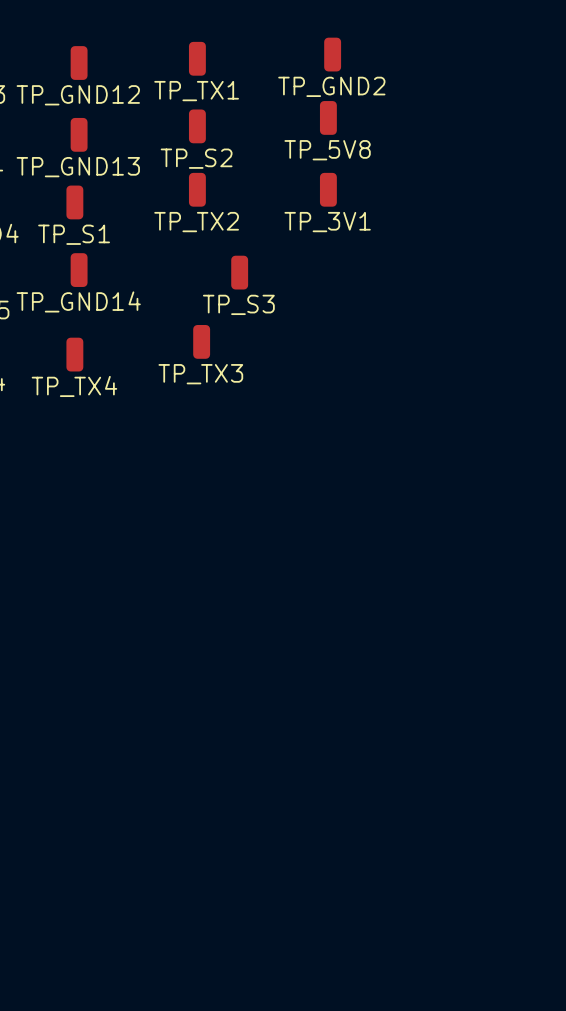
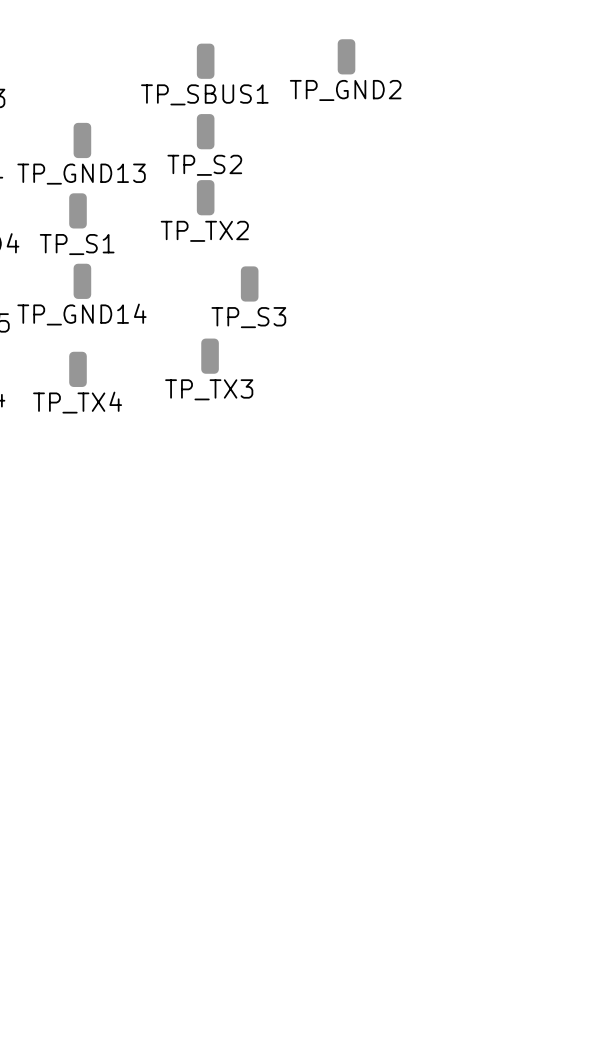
TP_GND12: (79, 63) -> none
TP_TX1 name: TP_TX1 (196, 91) -> TP_SBUS1 (204, 94)
TP_5V8: (328, 117) -> none
TP_3V1: (328, 189) -> none

